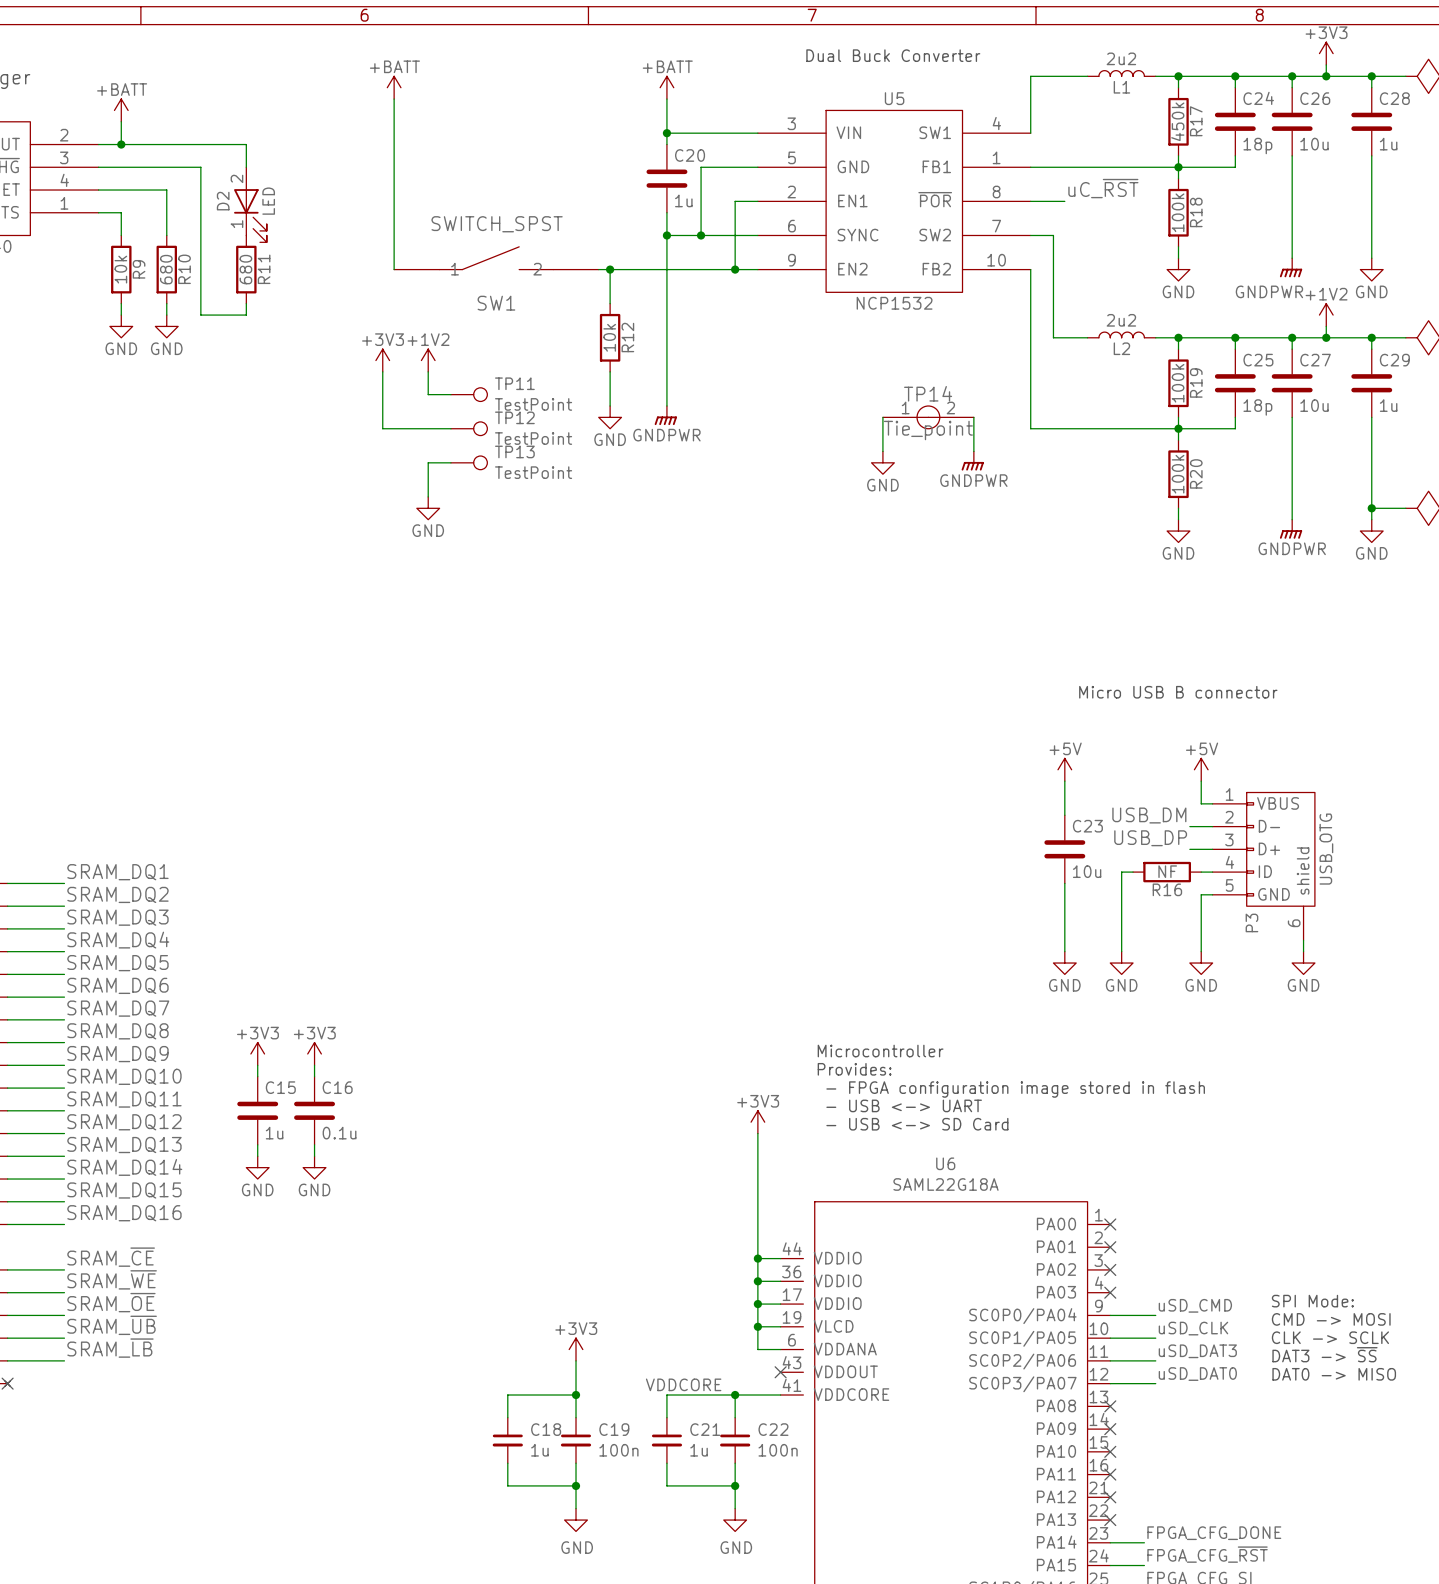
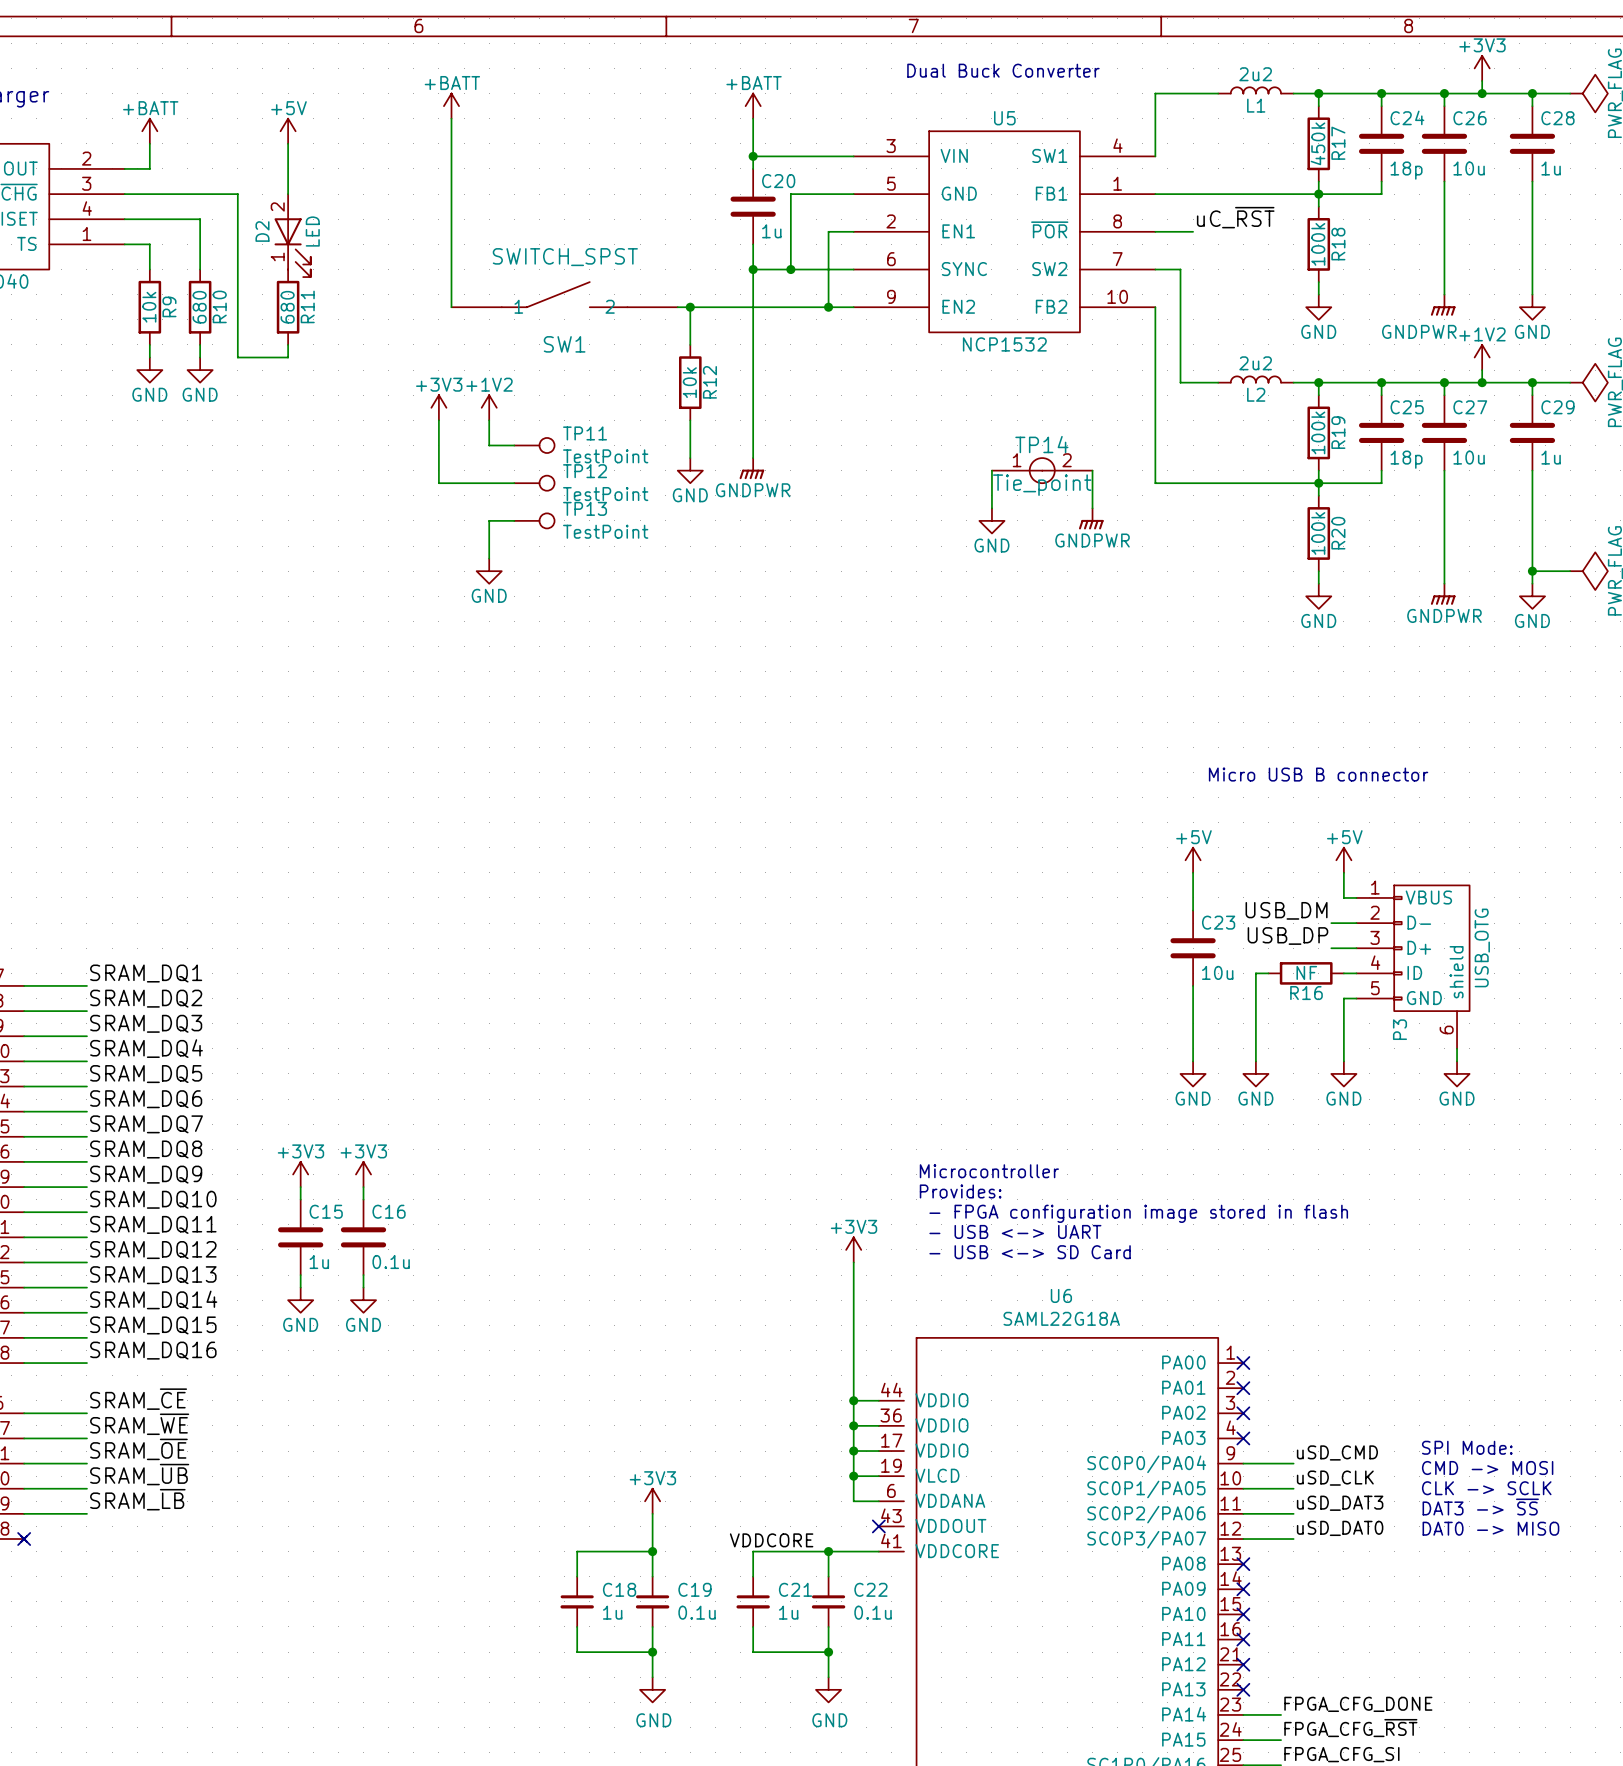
power symbol: none -> +5V (288, 131)
wire: (121, 144) (246, 144) -> (288, 143) (288, 168)
junction: (121, 144) -> none
C19 value: 100n (618, 1450) -> 0.1u (697, 1612)
C22 value: 100n (778, 1450) -> 0.1u (873, 1612)

